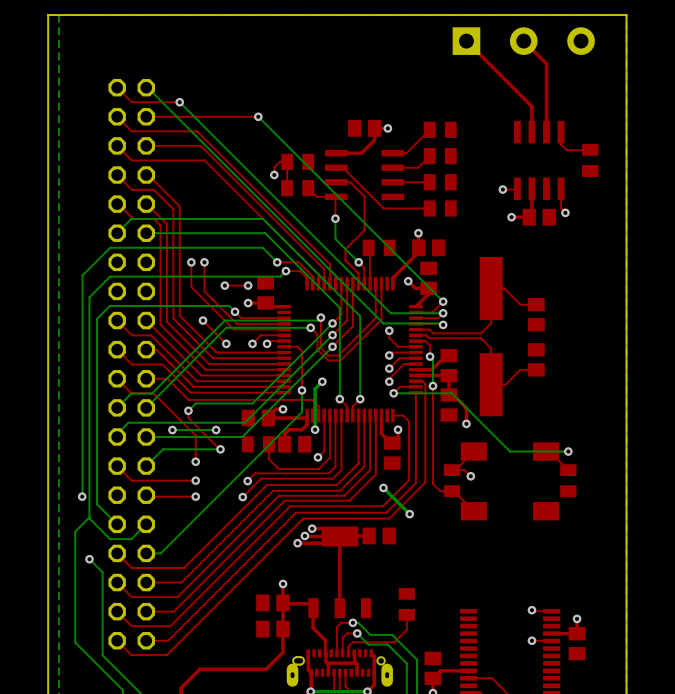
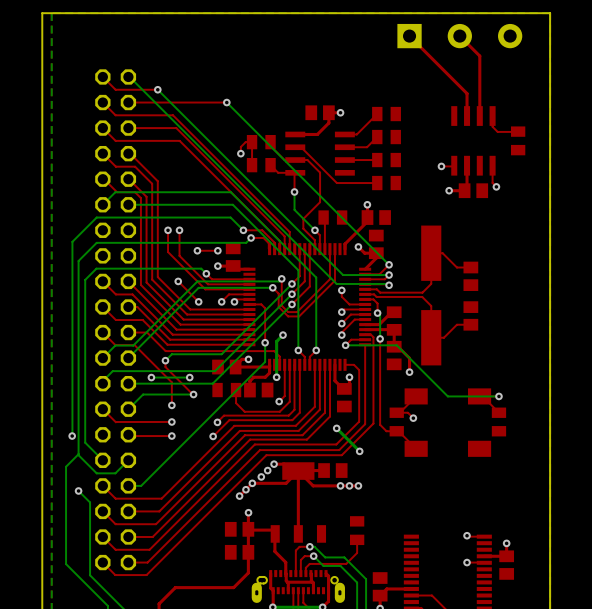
top track: (304, 535) (331, 536) -> none
top track: (329, 543) (297, 543) -> none
via: none -> (252, 483)
via: none -> (340, 485)
via: none -> (349, 485)
top track: none -> (358, 485) (313, 485) (298, 471) (286, 483) (252, 483) (239, 496)
via: none -> (358, 485)
via: none -> (245, 489)
via: none -> (239, 496)

